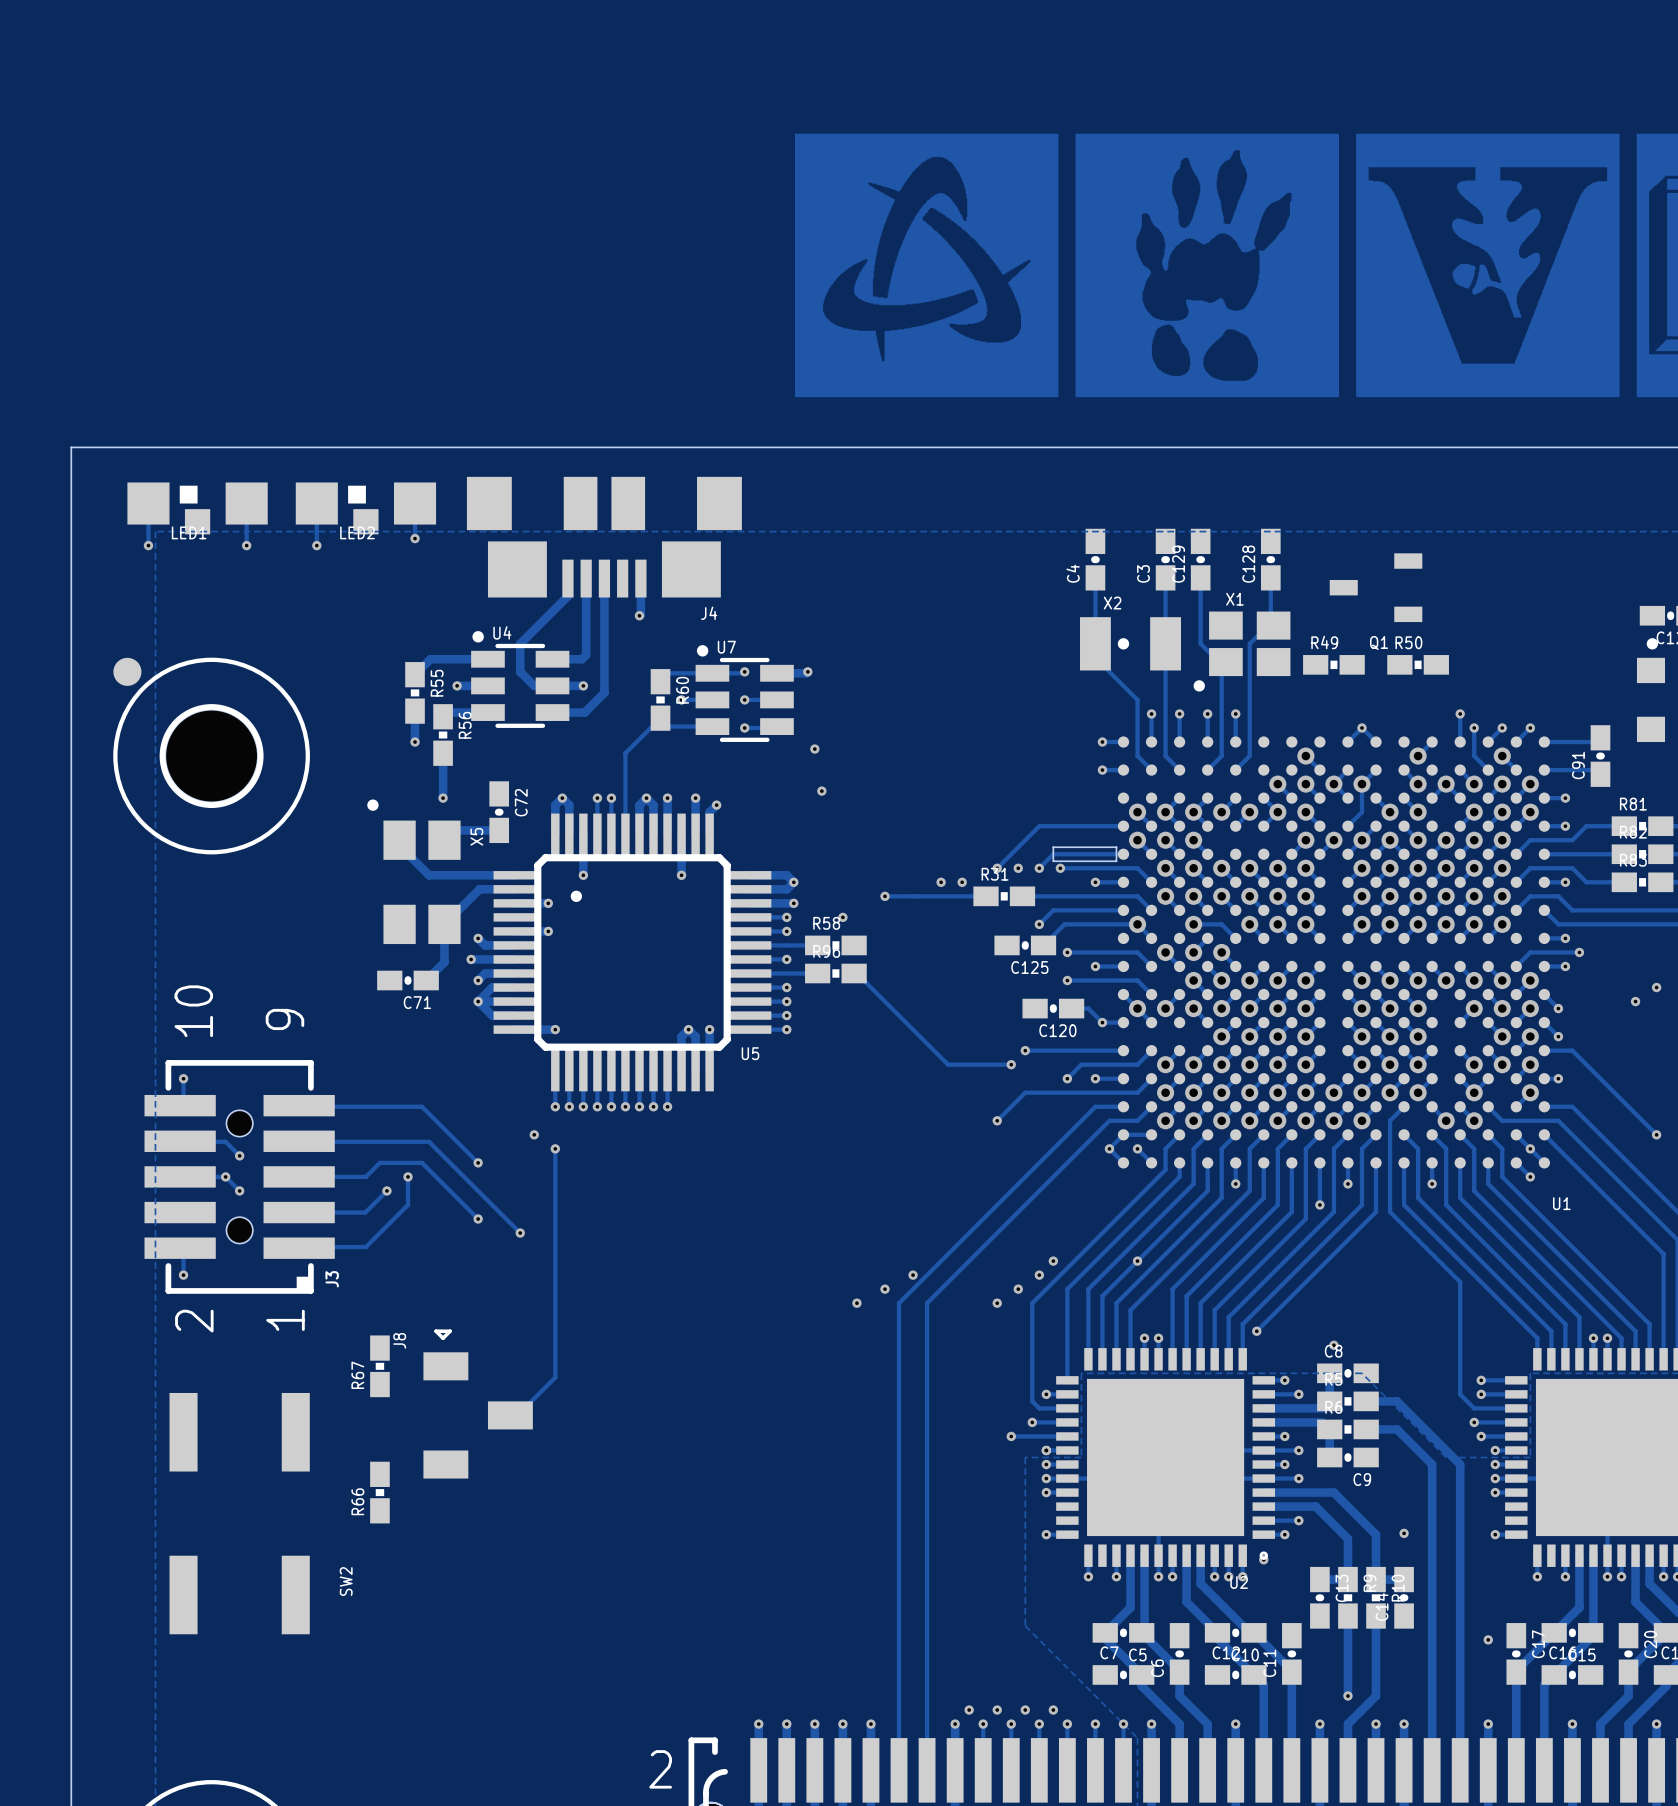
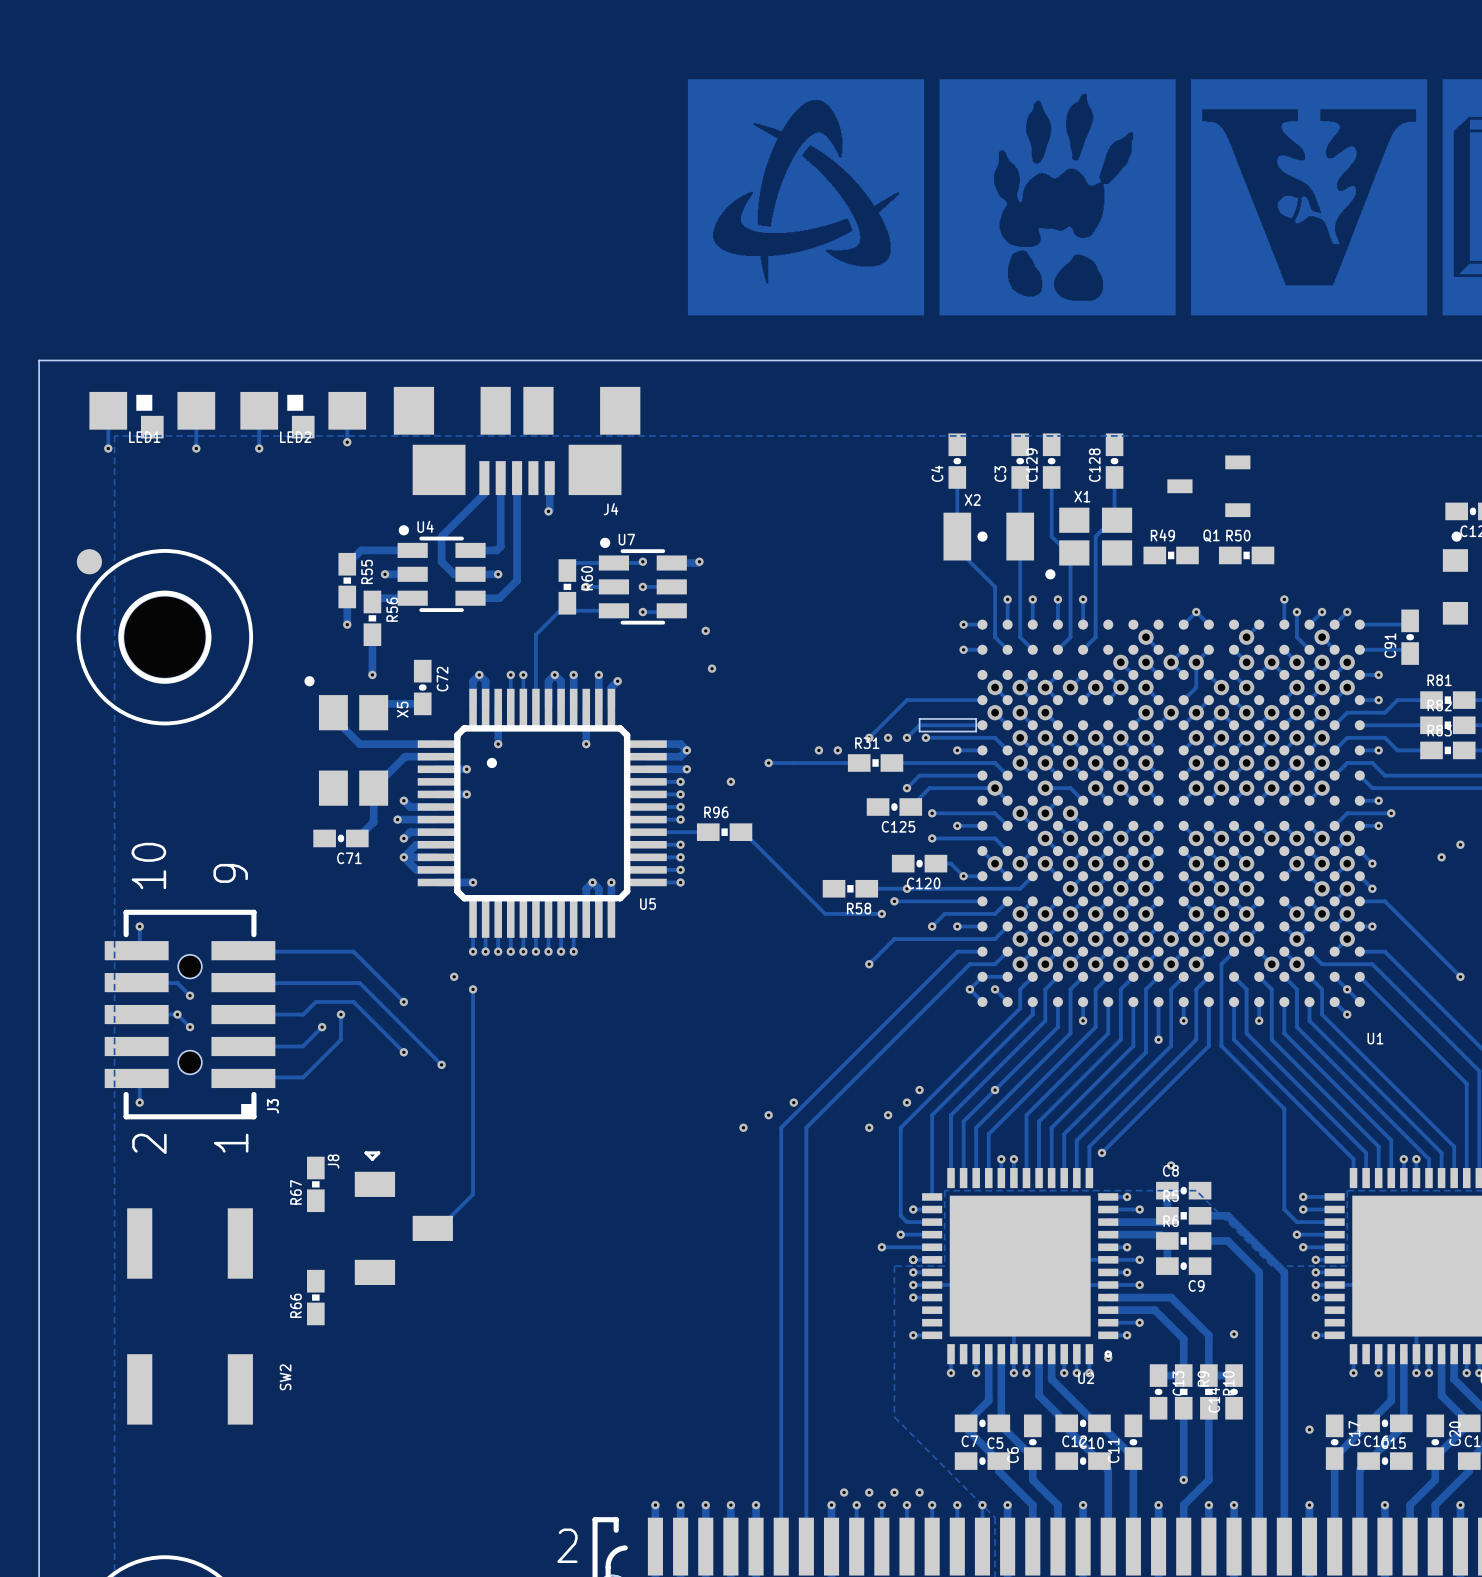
R58 name position: R58 (826, 923) -> R58 (859, 908)
track: (786, 945) (817, 945) -> none
via: none -> (680, 807)
R58 position: (835, 945) -> (850, 888)
track: none -> (1032, 876) (1020, 888) (866, 888)
via: none -> (907, 888)

